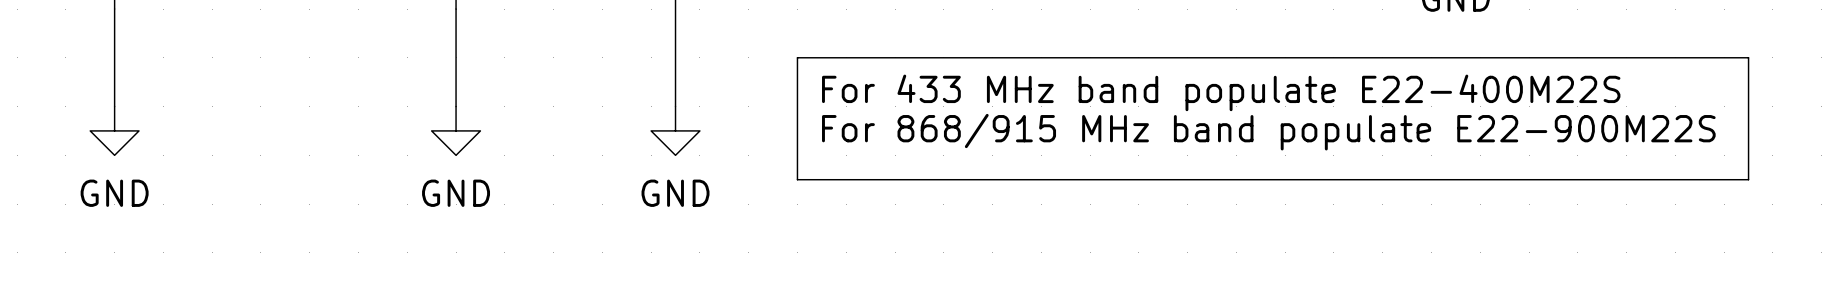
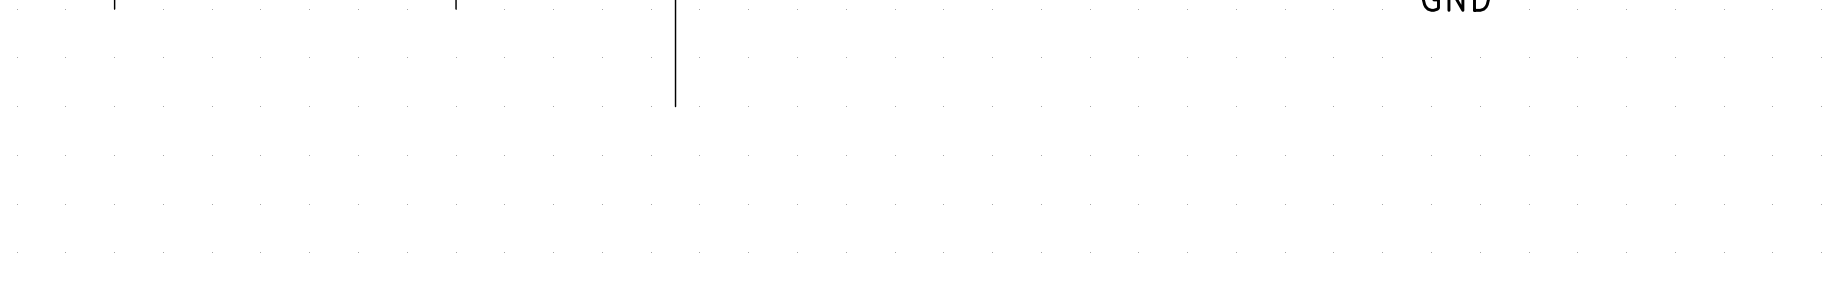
wire: (114, 9) (114, 106) -> none
wire: (456, 9) (456, 106) -> none
line: (797, 57) (1748, 57) (1748, 179) (797, 179) (797, 57) -> none
text: For 433 MHz band populate E22-400M22S (1221, 92) -> none
power symbol: GND (114, 130) -> none
power symbol: GND (456, 130) -> none
power symbol: GND (675, 130) -> none
text: For 868/915 MHz band populate E22-900M22S (1268, 132) -> none

